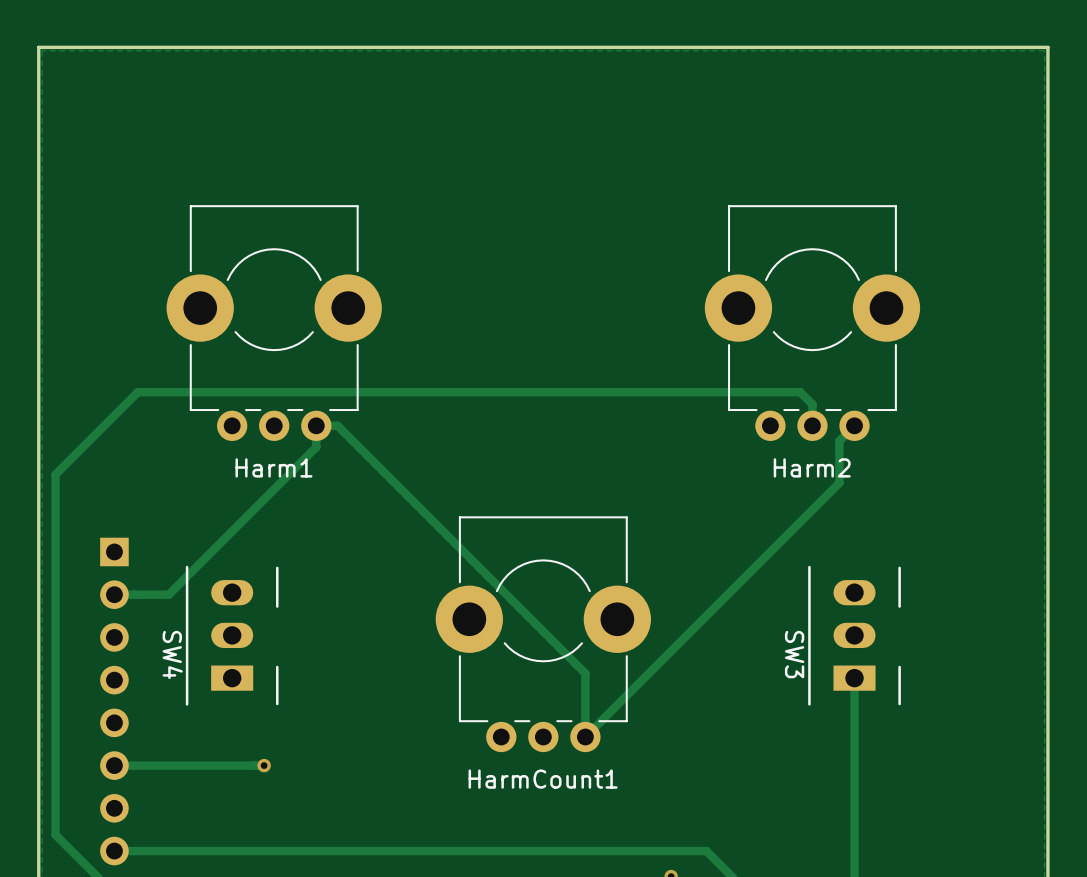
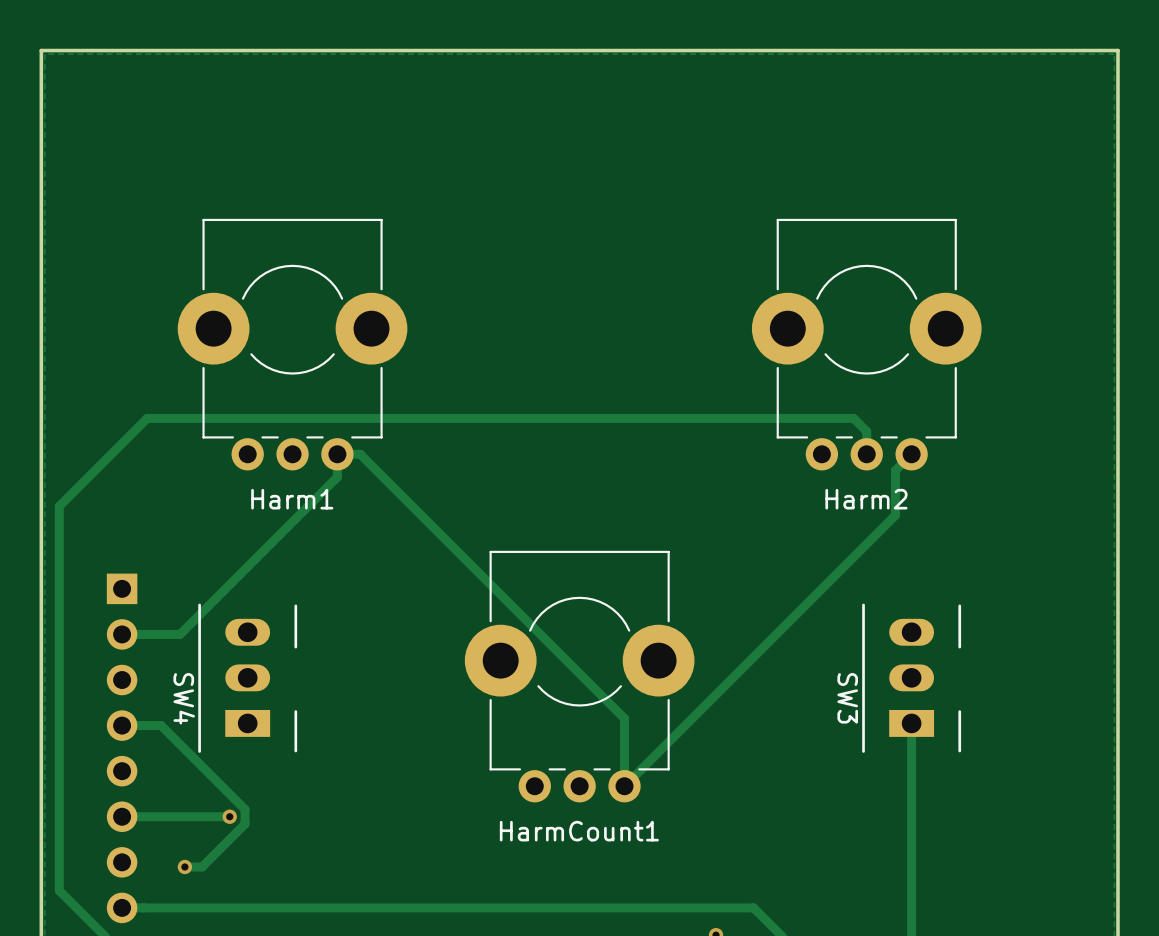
track: none -> (122, 725) (161, 725) (245, 809) (245, 824) (202, 866) (184, 866)
track: (264, 765) (215, 765) -> none
via position: (264, 765) -> (229, 816)
via: none -> (184, 866)

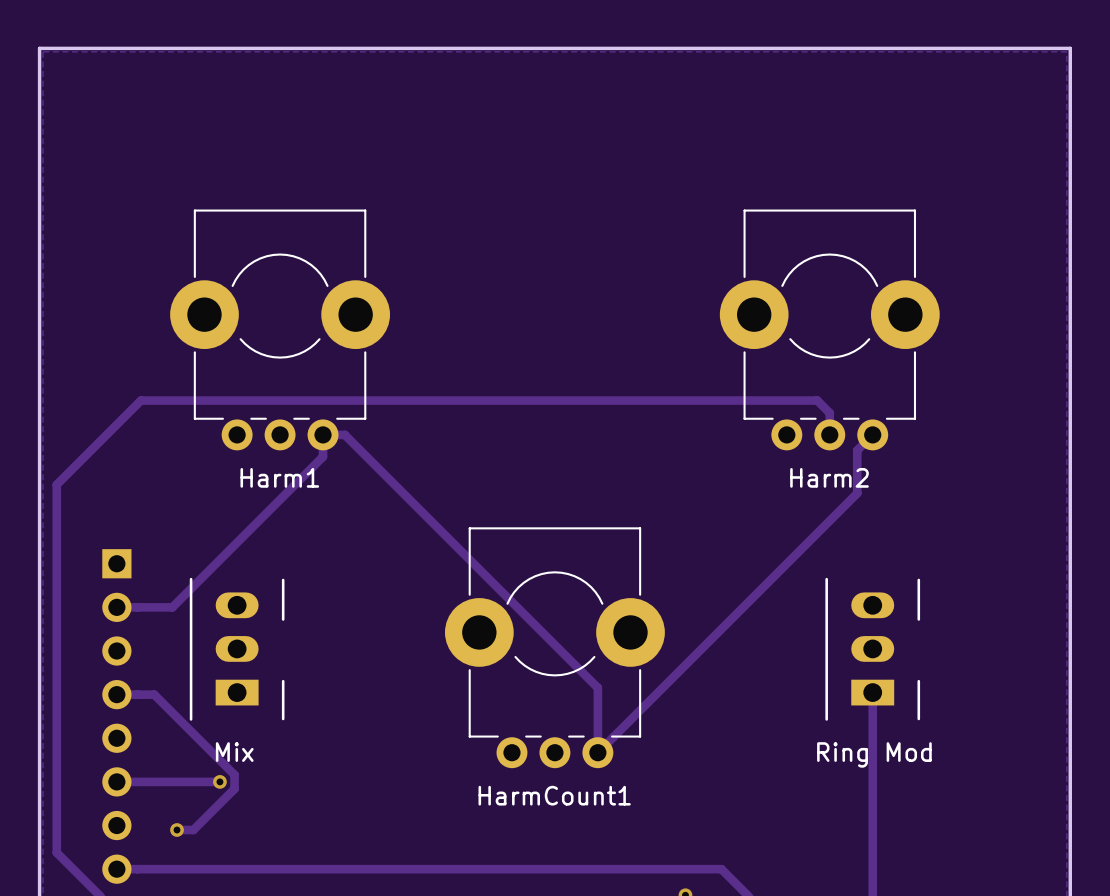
SW4 name: SW4 (184, 698) -> none
SW3 name: SW3 (847, 698) -> none
text: none -> Mix (234, 752)
text: none -> Ring Mod (874, 754)

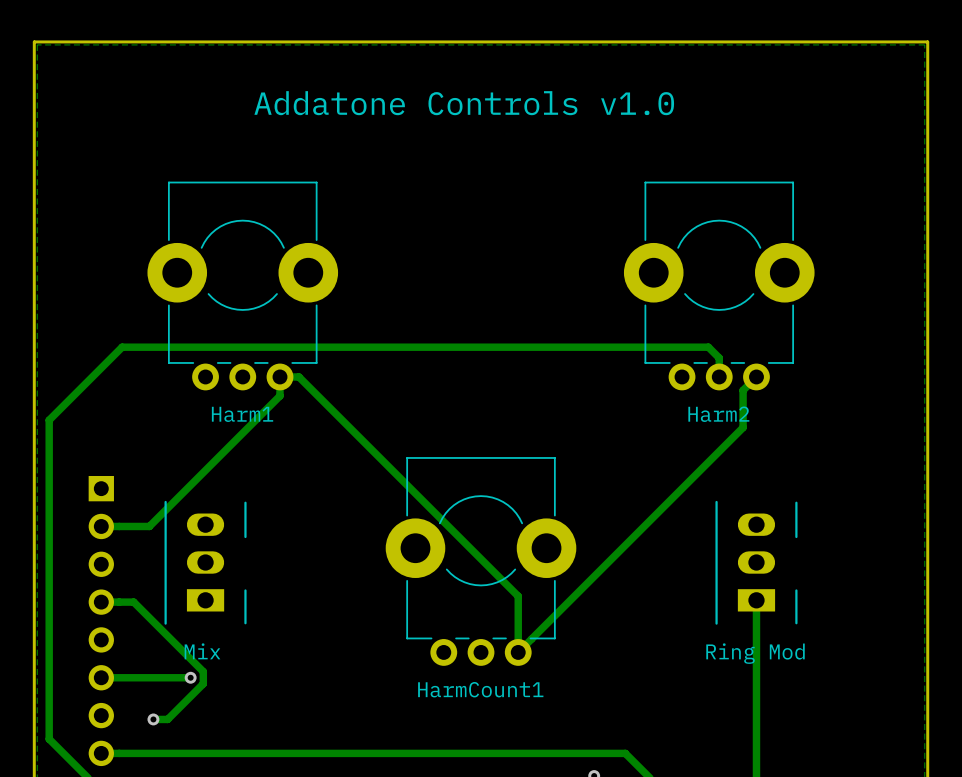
text: none -> Addatone Controls v1.0 (464, 103)

